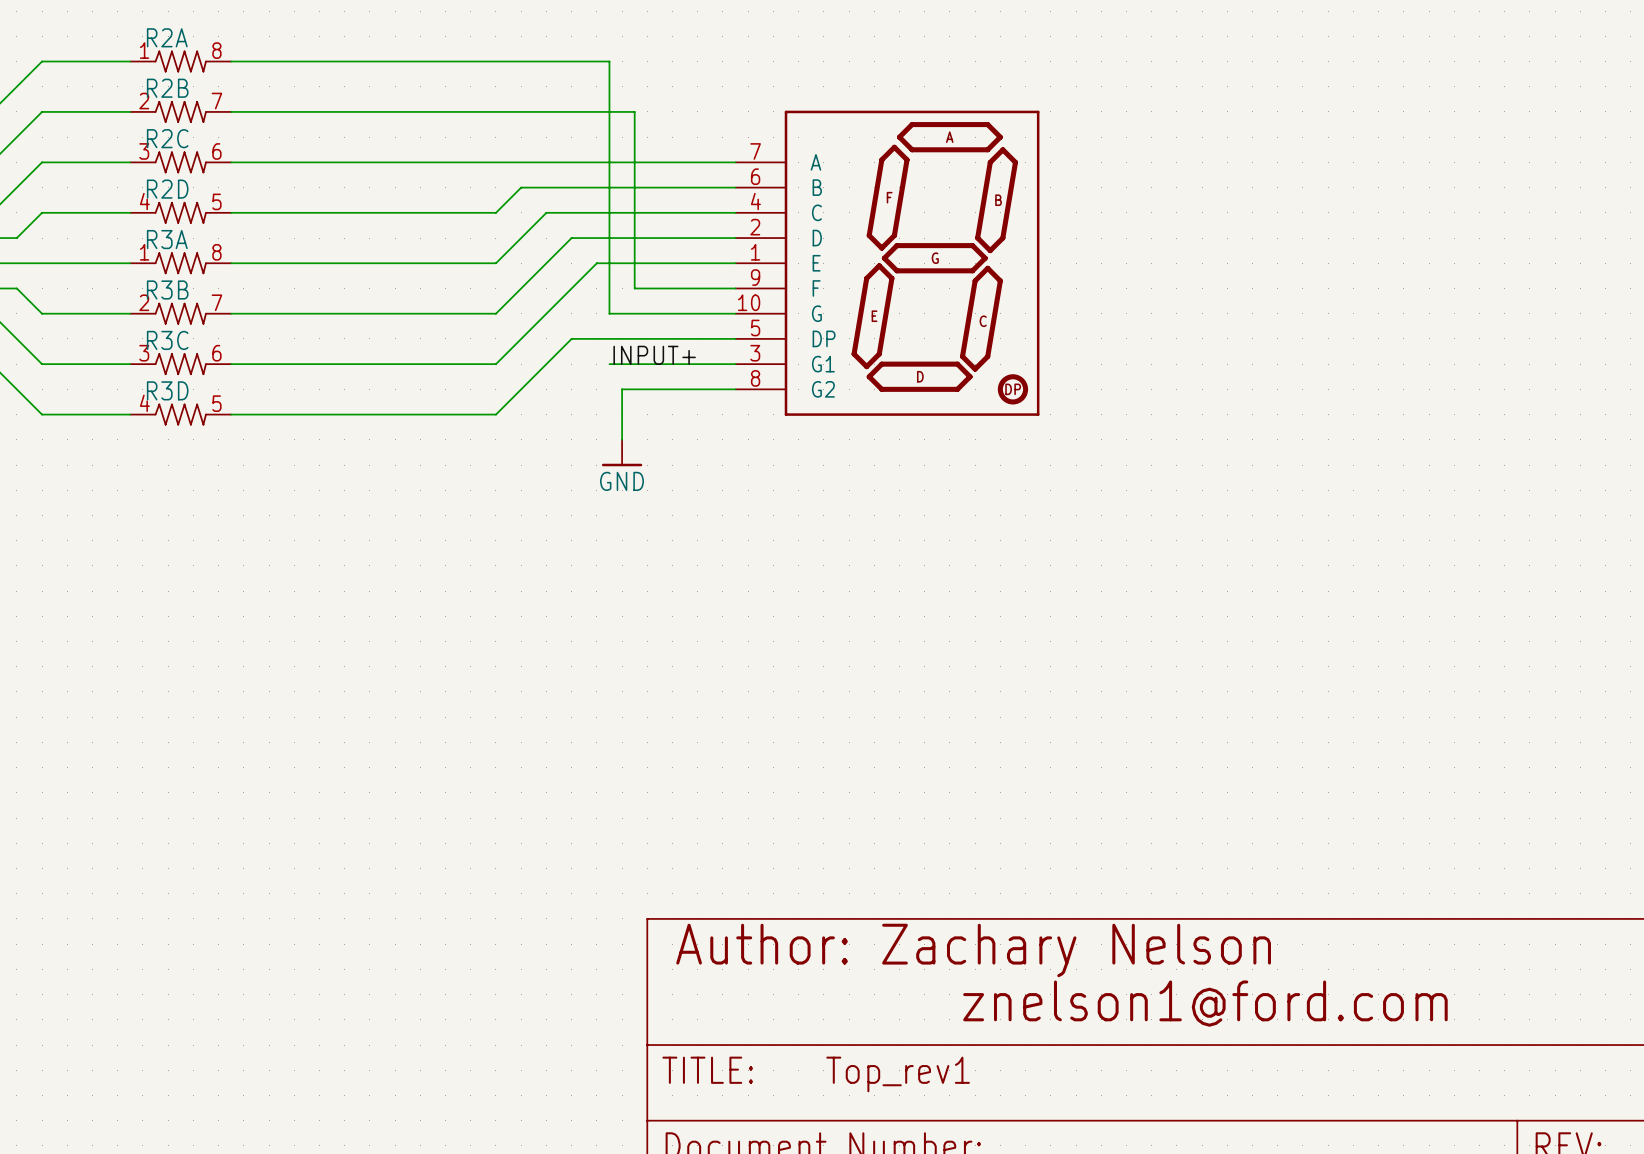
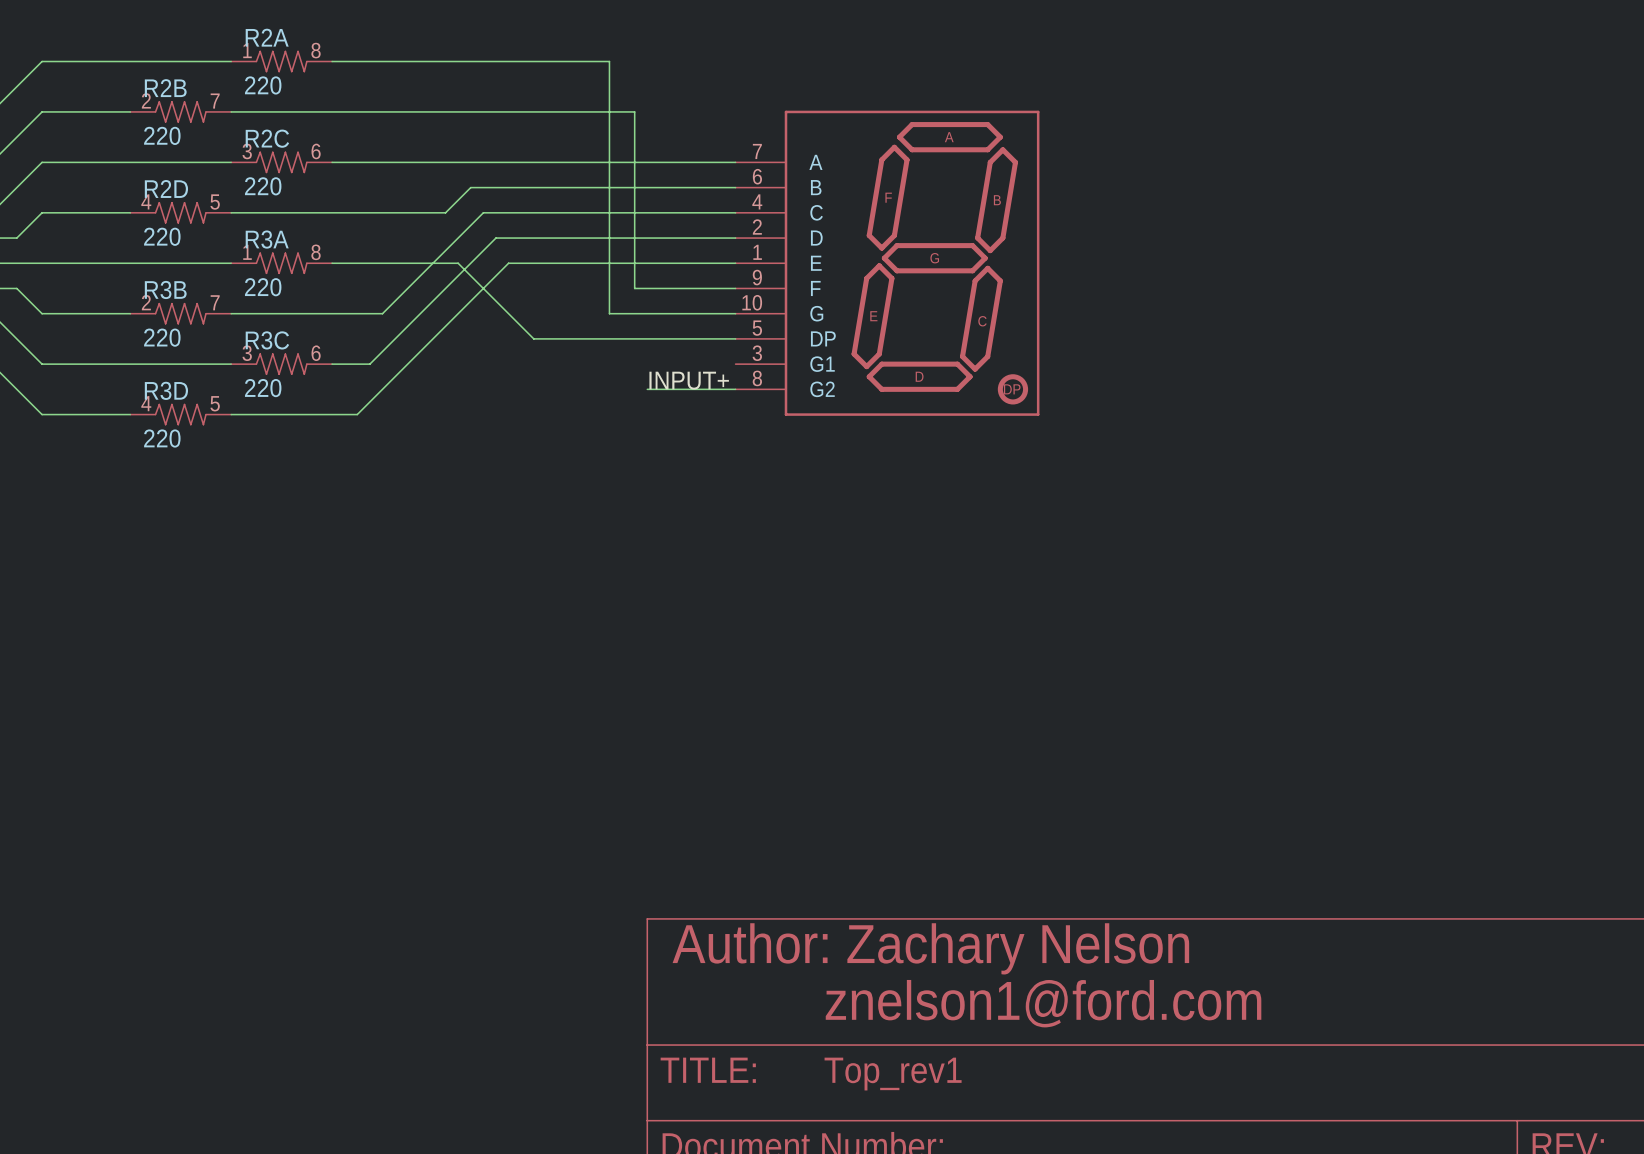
R2A position: (180, 61) -> (281, 61)
R2A value: none -> 220 (263, 85)
R2B value: none -> 220 (162, 135)
R2C position: (180, 162) -> (281, 162)
R2C value: none -> 220 (263, 186)
wire: (521, 187) (495, 212) -> (546, 212) (495, 212)
wire: (445, 212) (483, 212) -> (445, 212) (470, 187) (521, 187)
wire: (546, 212) (495, 263) (458, 263) -> (571, 338) (533, 338) (458, 263)
R2D value: none -> 220 (162, 236)
wire: (571, 238) (495, 313) (382, 313) -> (483, 212) (382, 313)
R3A position: (180, 263) -> (281, 263)
wire: (596, 263) (495, 364) (369, 364) -> (571, 238) (495, 238) (369, 364)
R3A value: none -> 220 (263, 287)
R3B value: none -> 220 (162, 337)
wire: (571, 338) (495, 414) (357, 414) -> (596, 263) (508, 263) (357, 414)
label position: INPUT+ (654, 355) -> INPUT+ (689, 380)
R3C position: (180, 364) -> (281, 364)
wire: (609, 364) (735, 364) -> none
R3C value: none -> 220 (263, 388)
wire: (647, 389) (622, 389) (622, 439) -> none
R3D value: none -> 220 (162, 438)
power symbol: GND (622, 453) -> none

